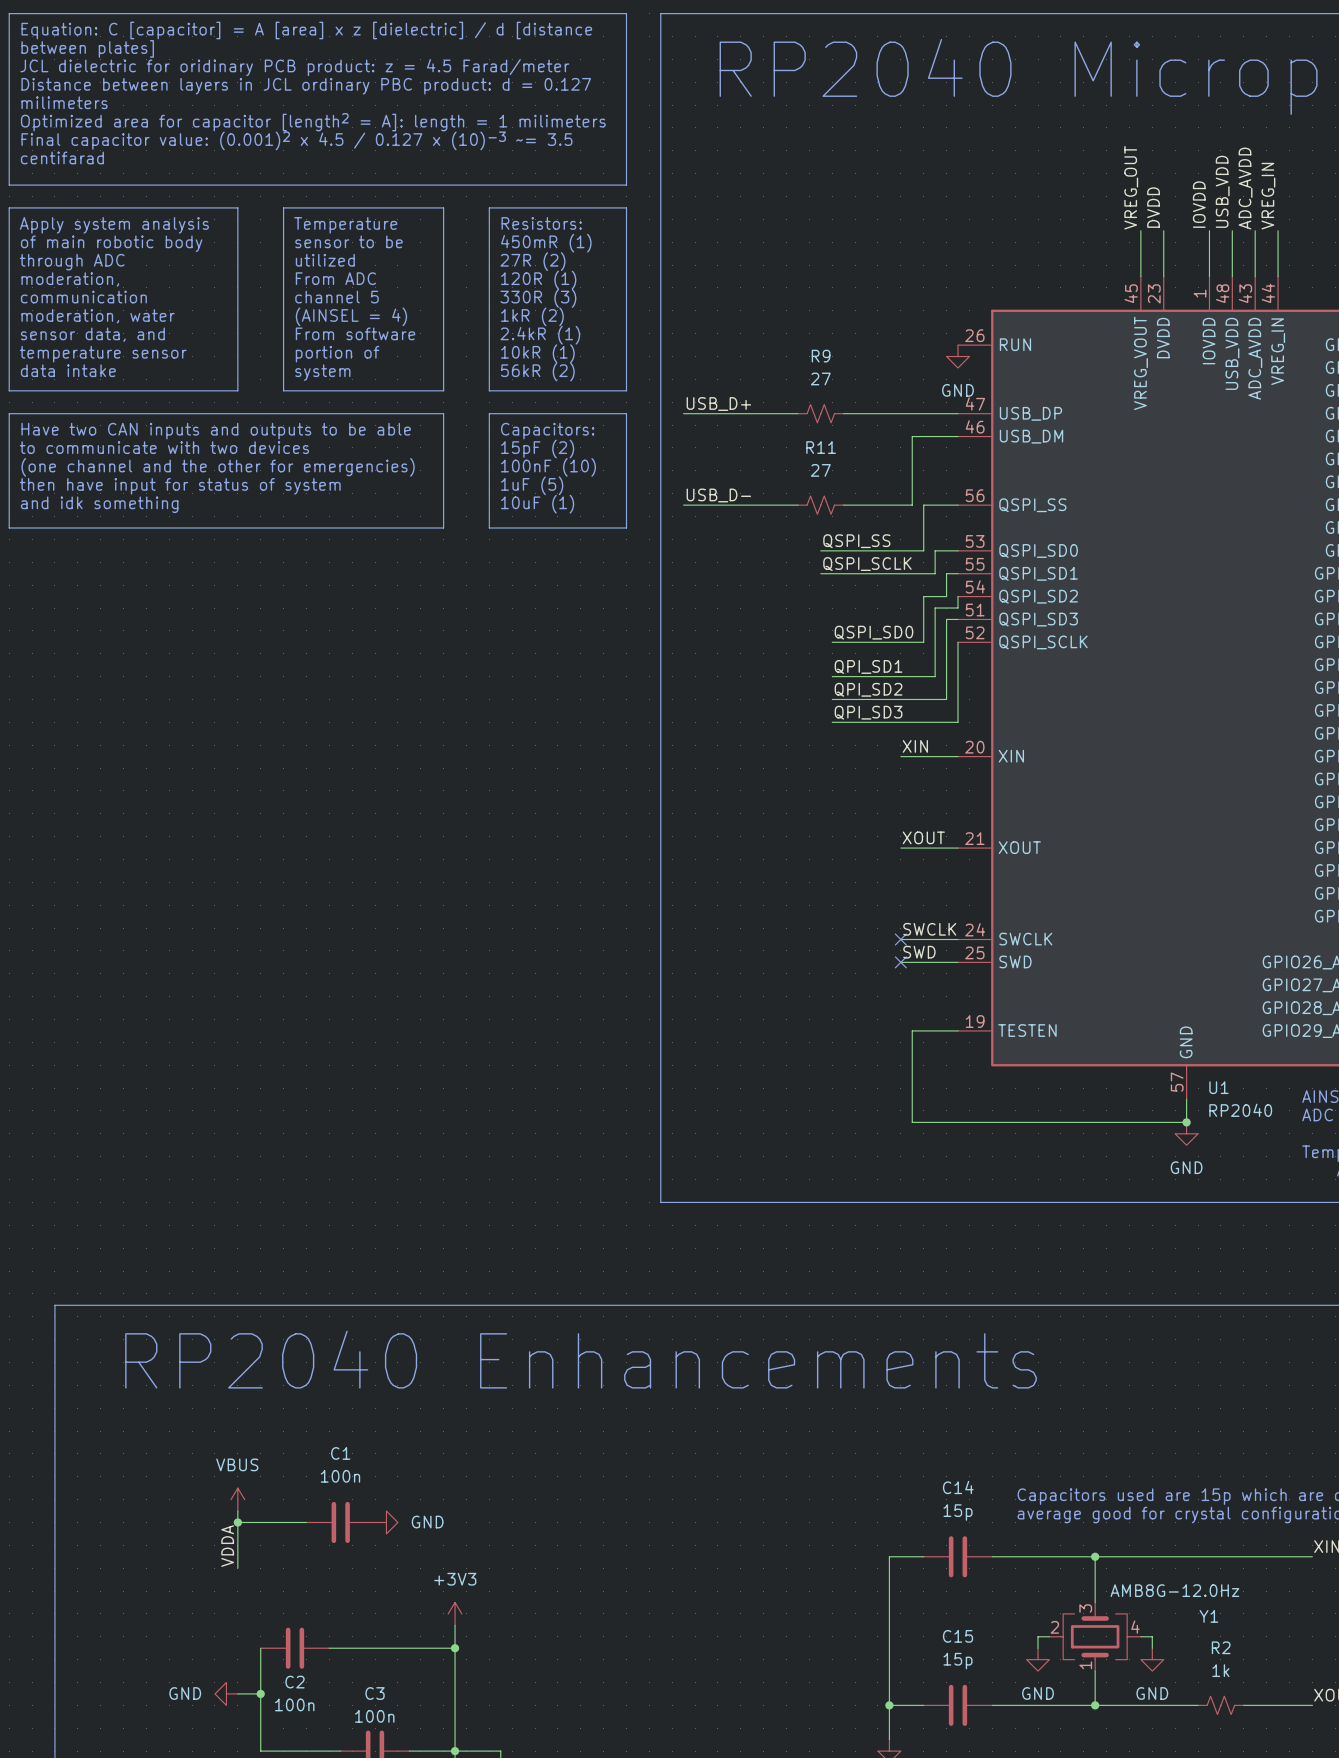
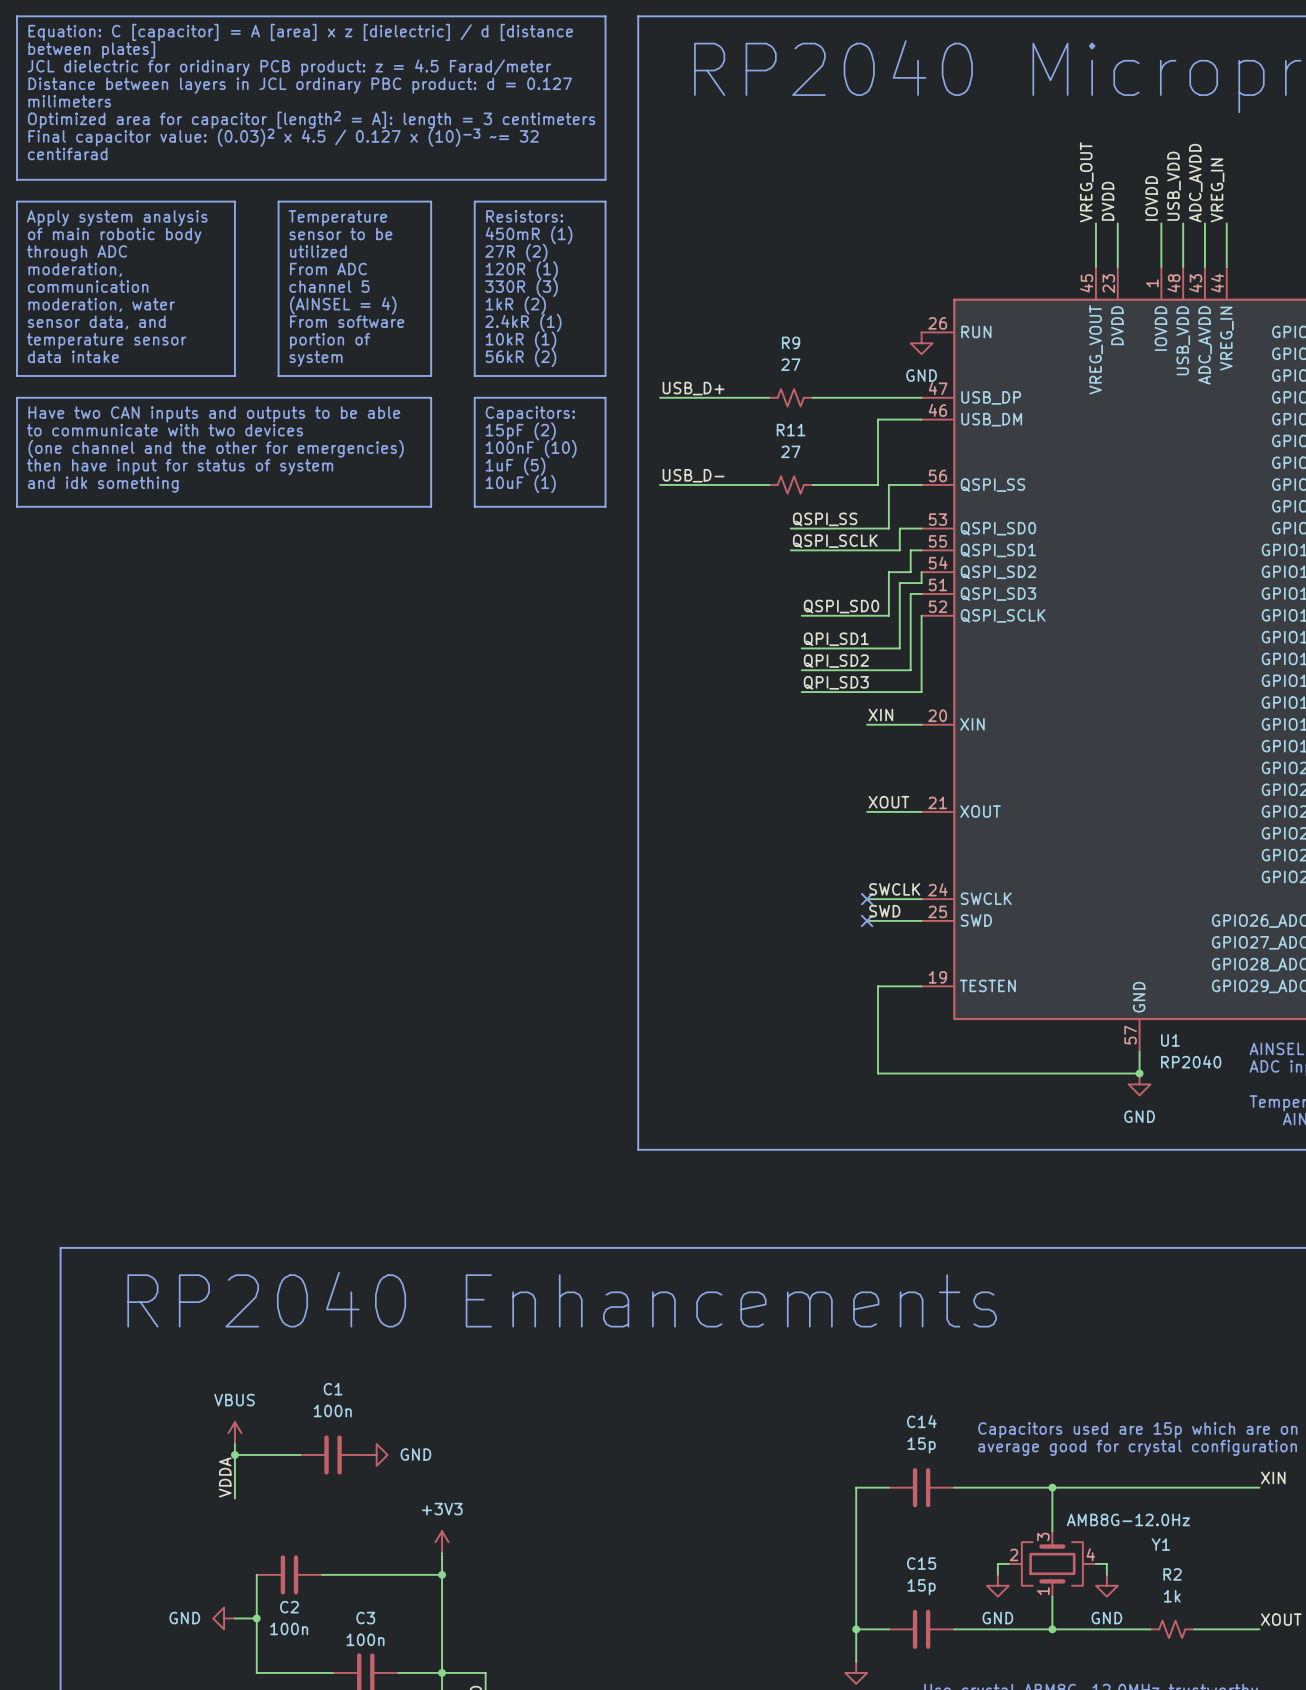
text: Optimized area for capacitor [length2 = A]: length = 1 milimeters (313, 122) -> Optimized area for capacitor [length2 = A]: length = 3 centimeters (311, 119)
text: Final capacitor value: (0.001)2 x 4.5 / 0.127 x (10)-3 ~= 3.5 (296, 140) -> Final capacitor value: (0.03)2 x 4.5 / 0.127 x (10)-3 ~= 32 (283, 137)

